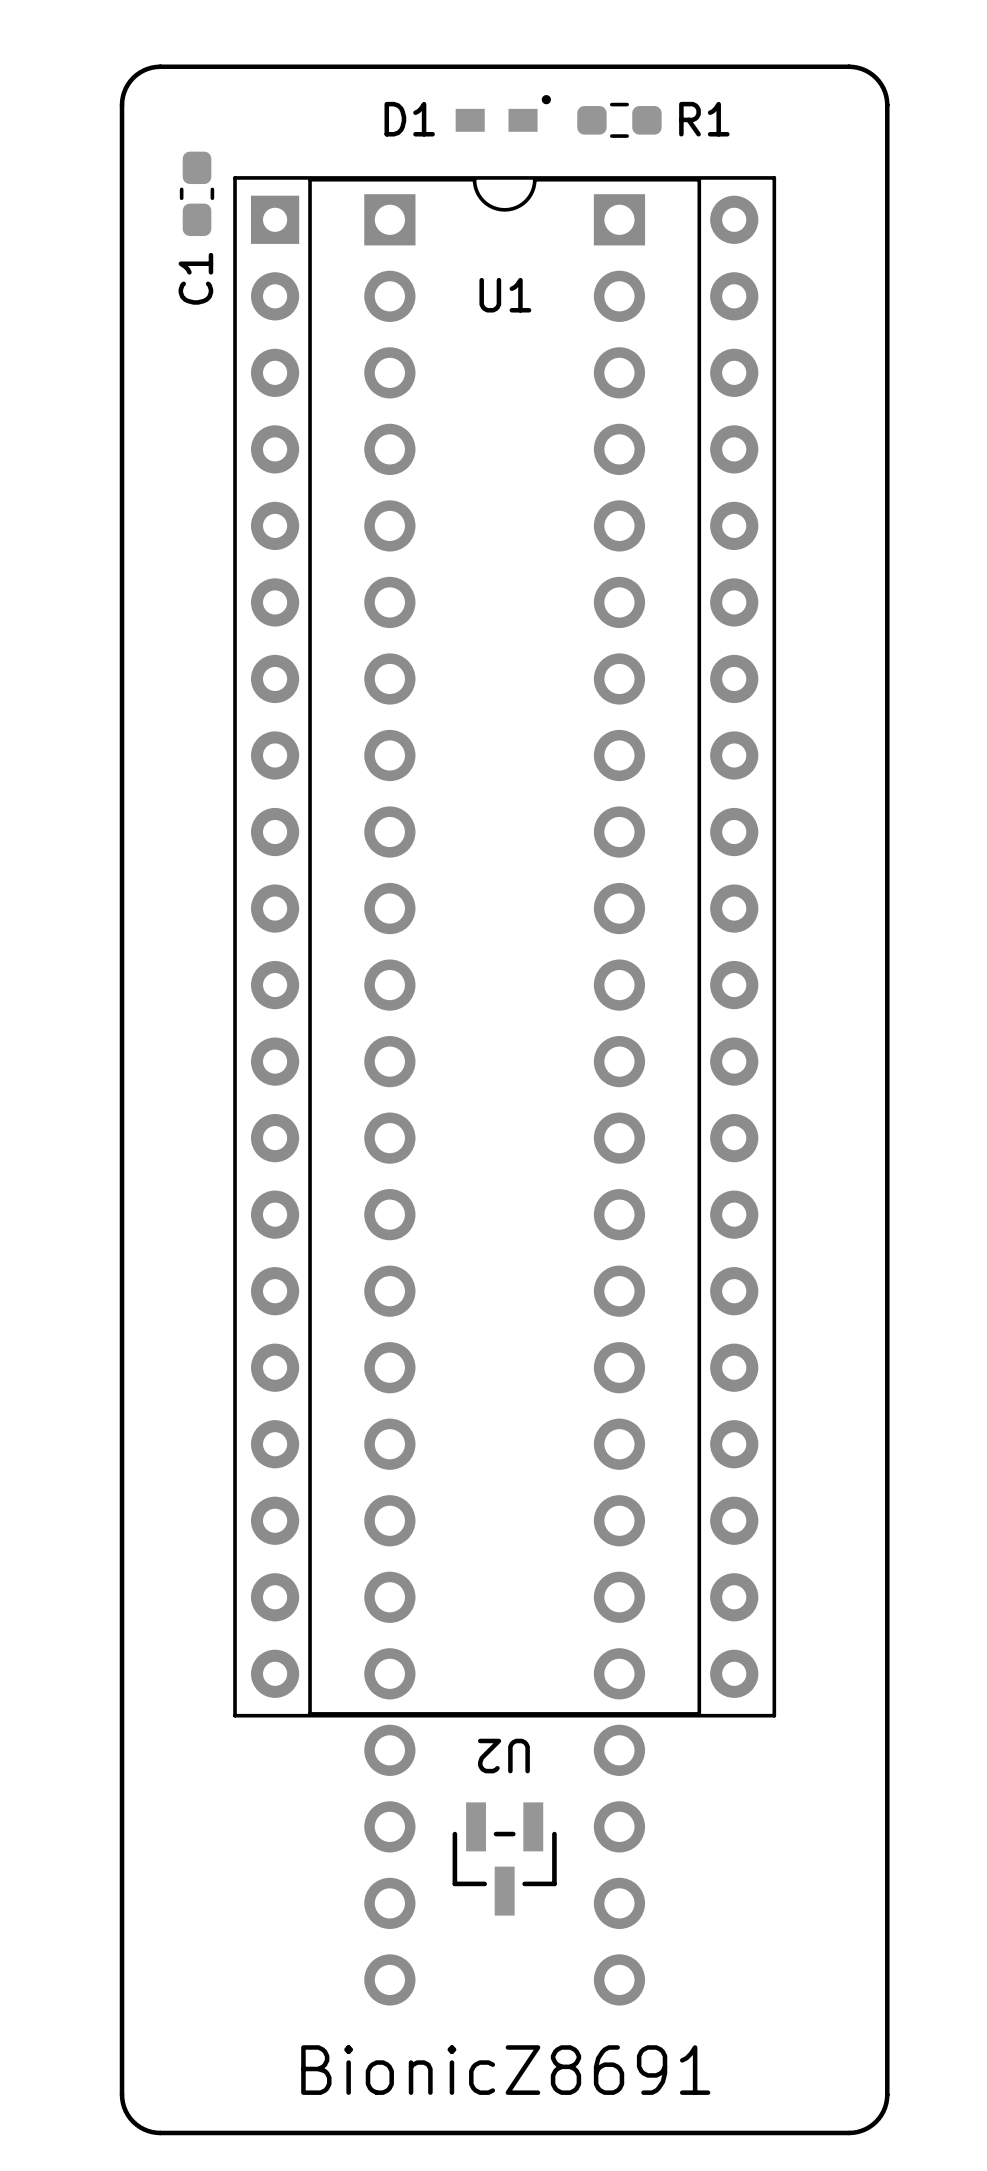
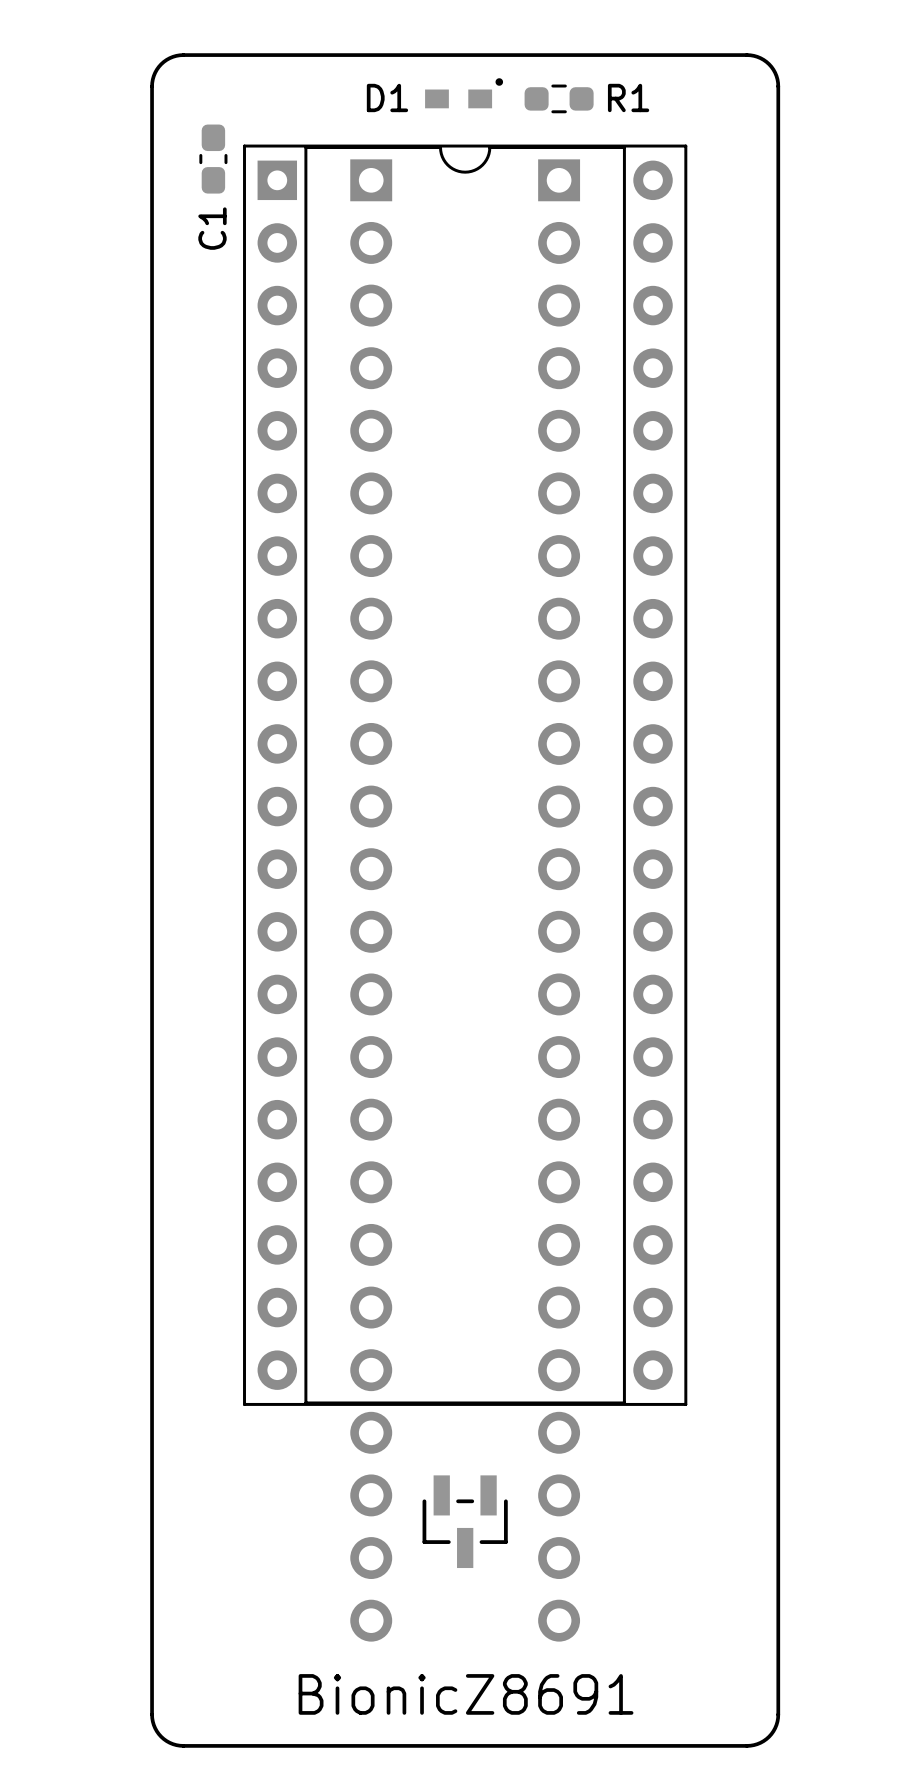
U1 name: U1 (505, 295) -> none
U2 name: U2 (503, 1756) -> none

